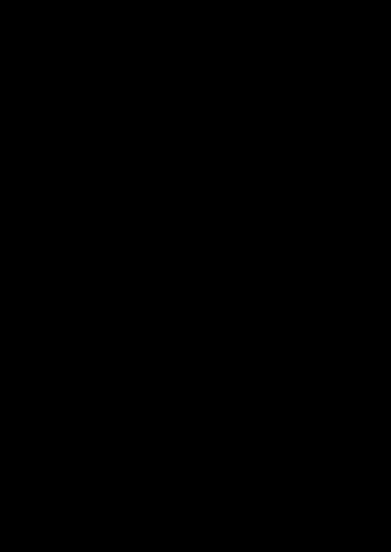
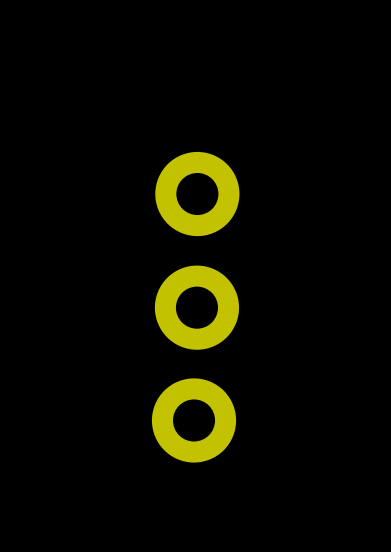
part: none -> (197, 194)
part: none -> (196, 307)
part: none -> (194, 420)

